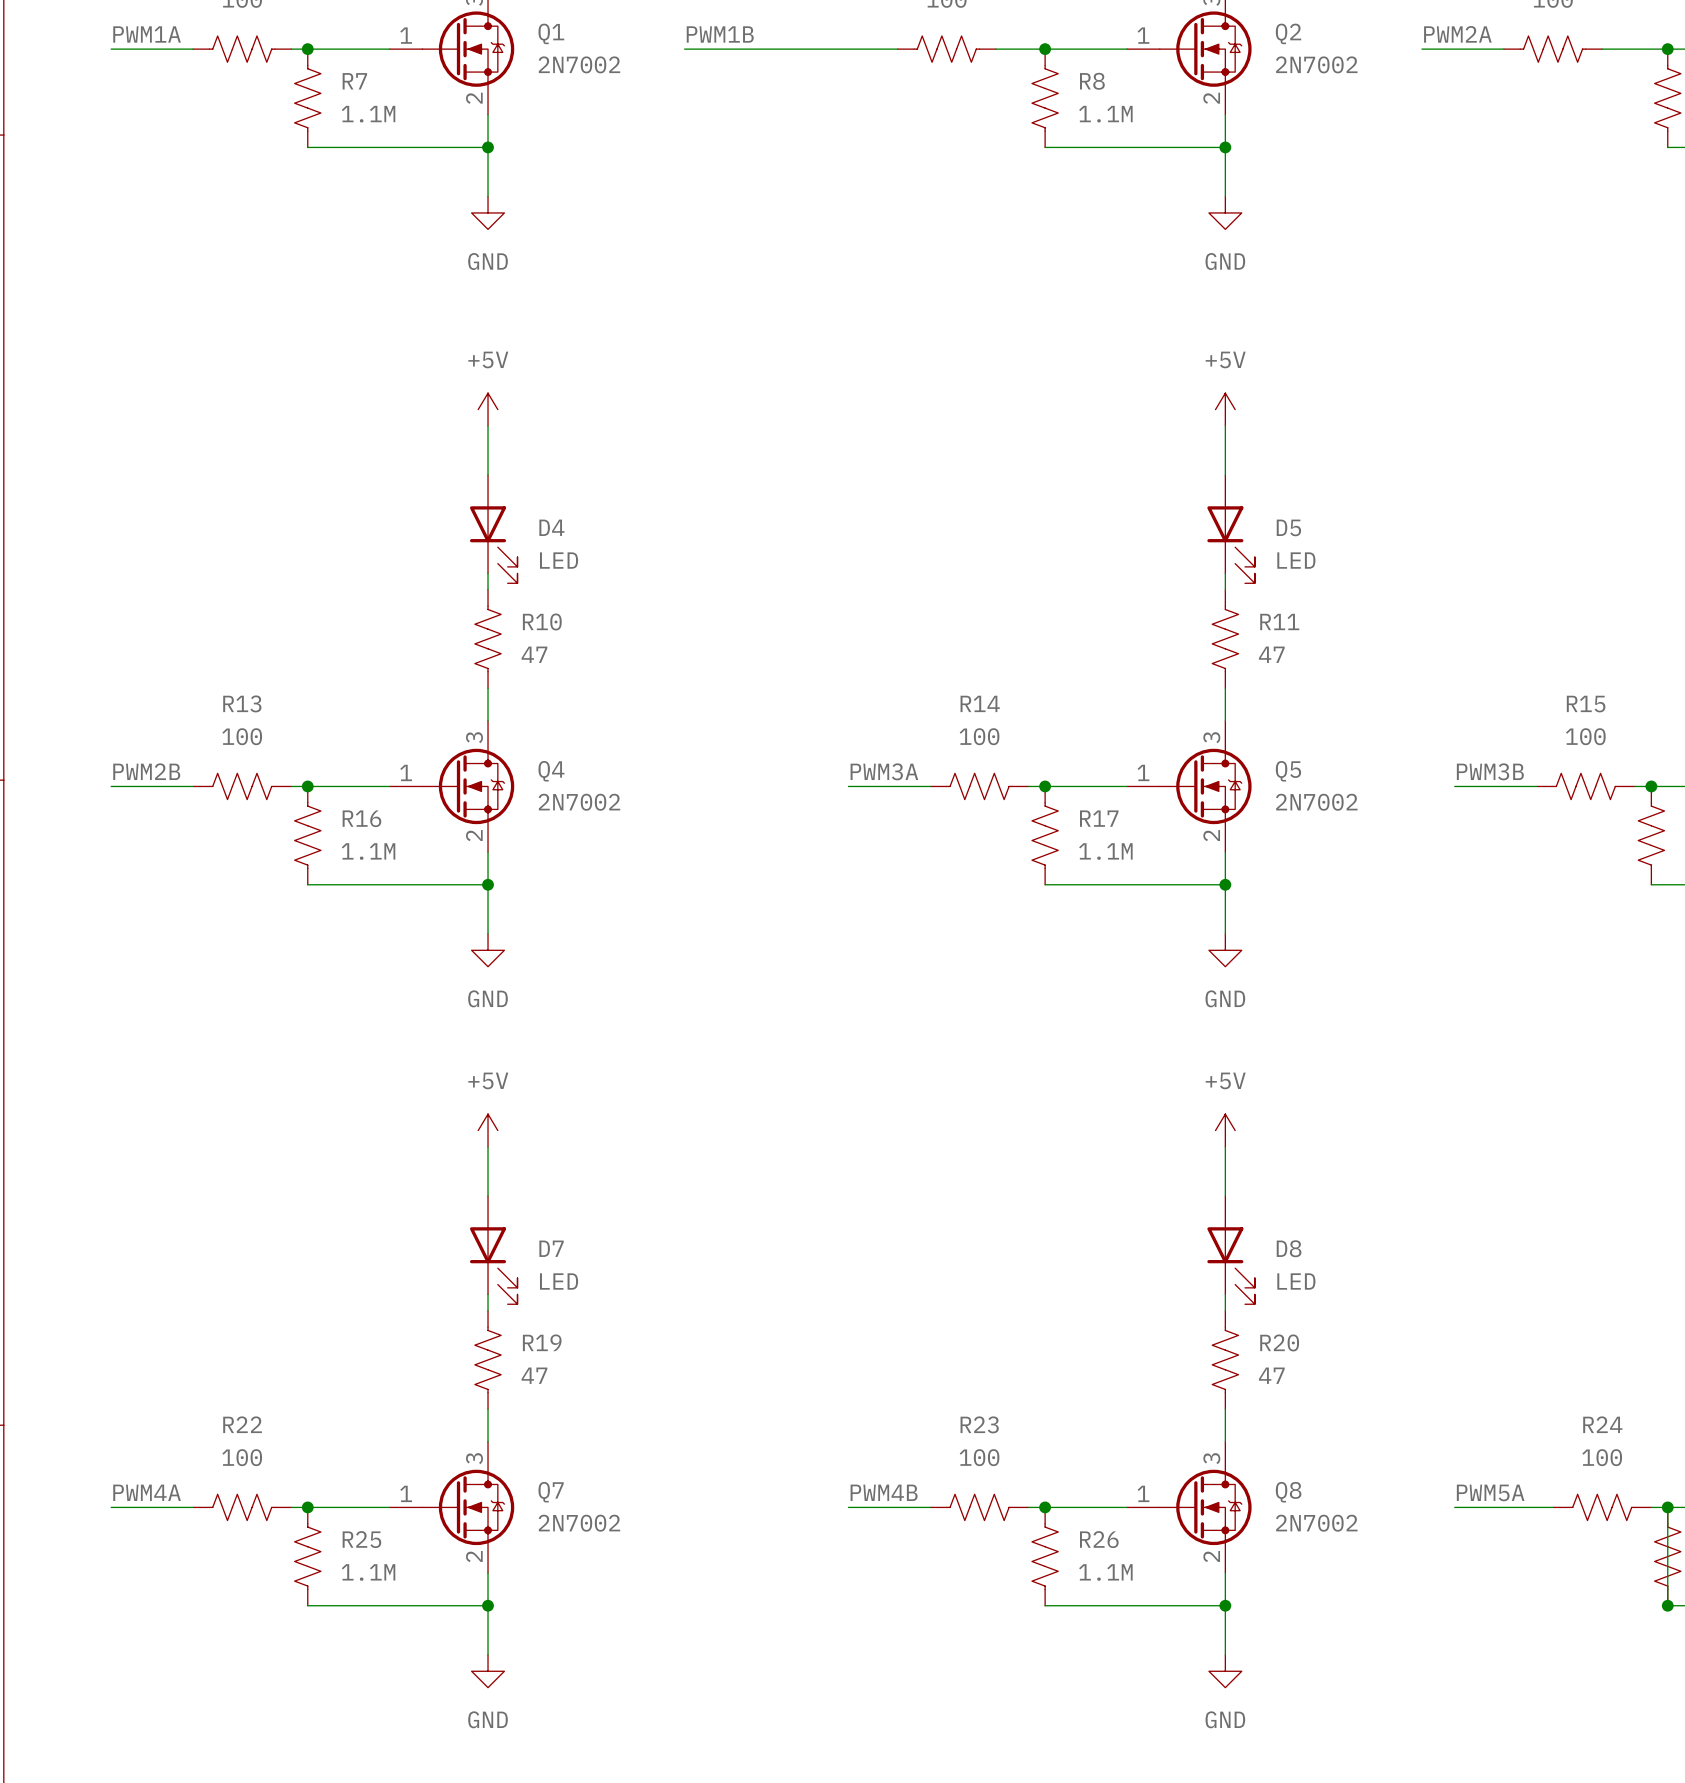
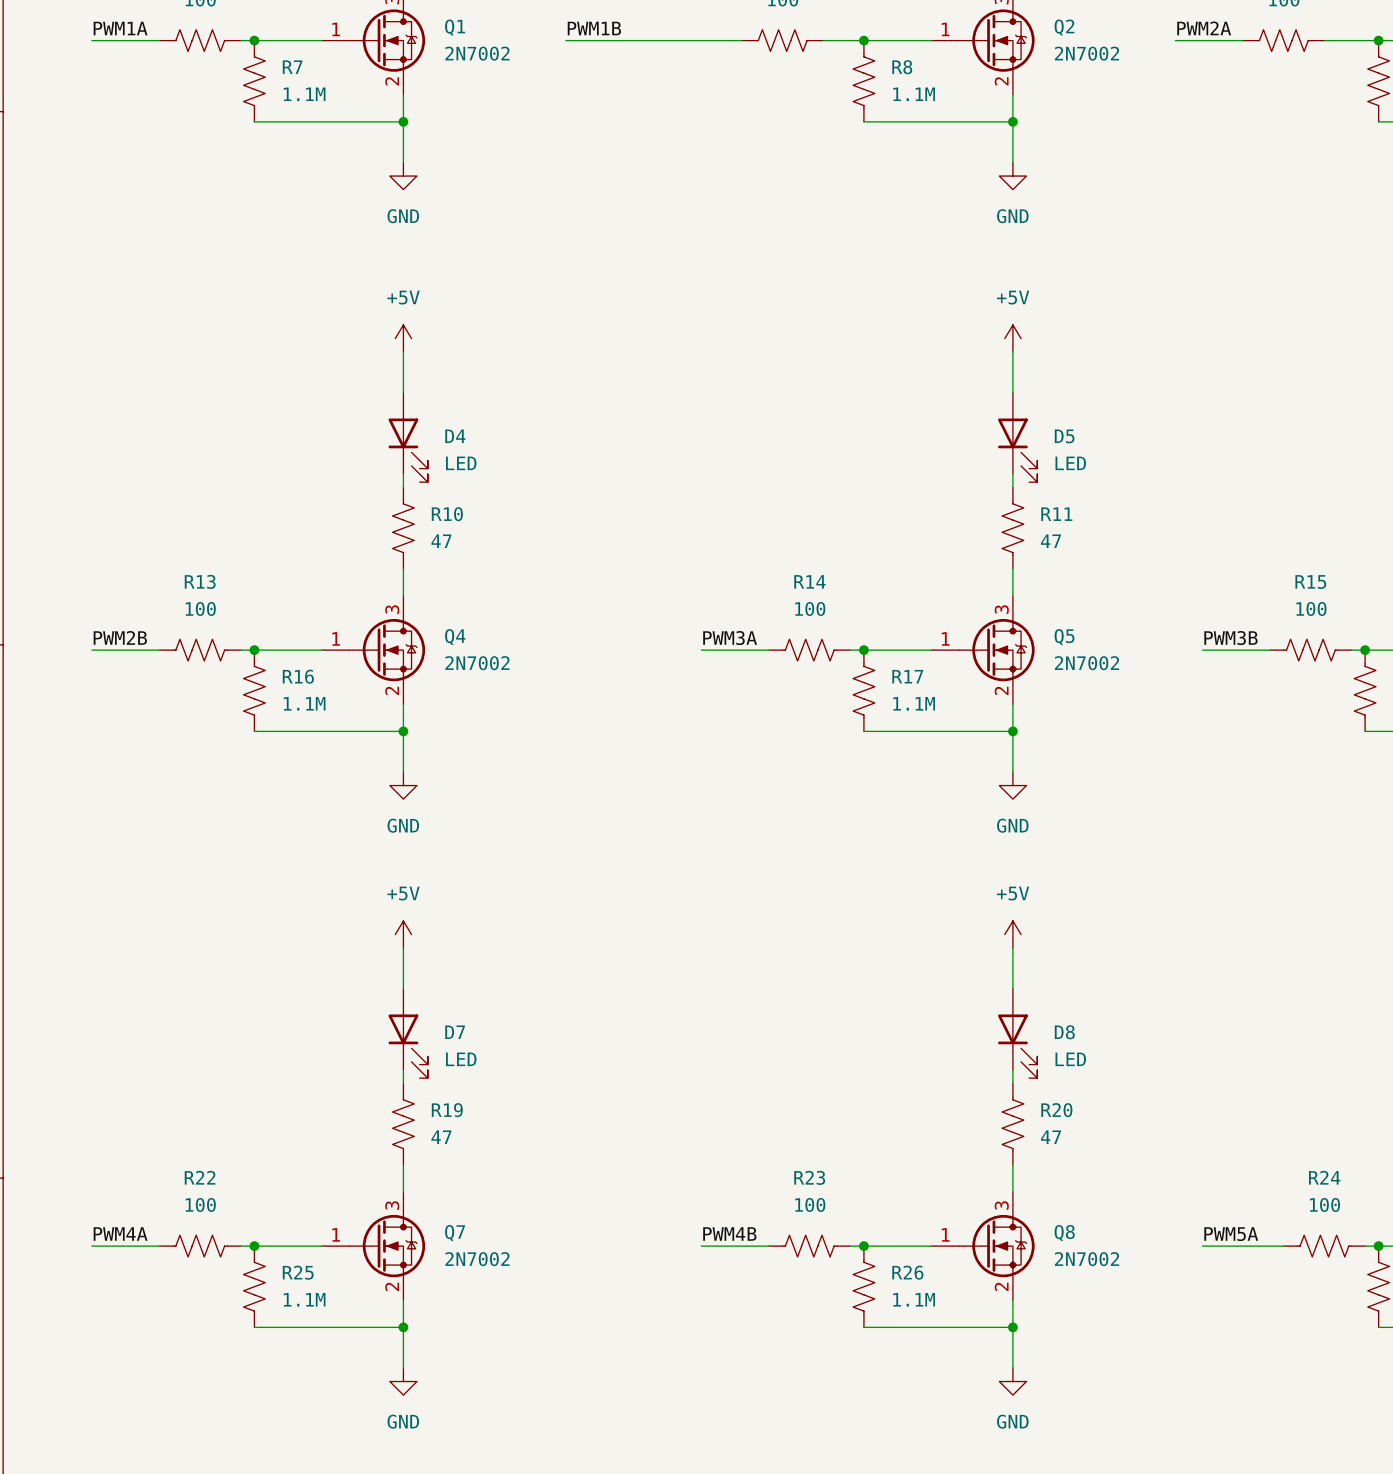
wire: (1667, 1507) (1667, 1605) -> none
junction: (1667, 1605) -> none

